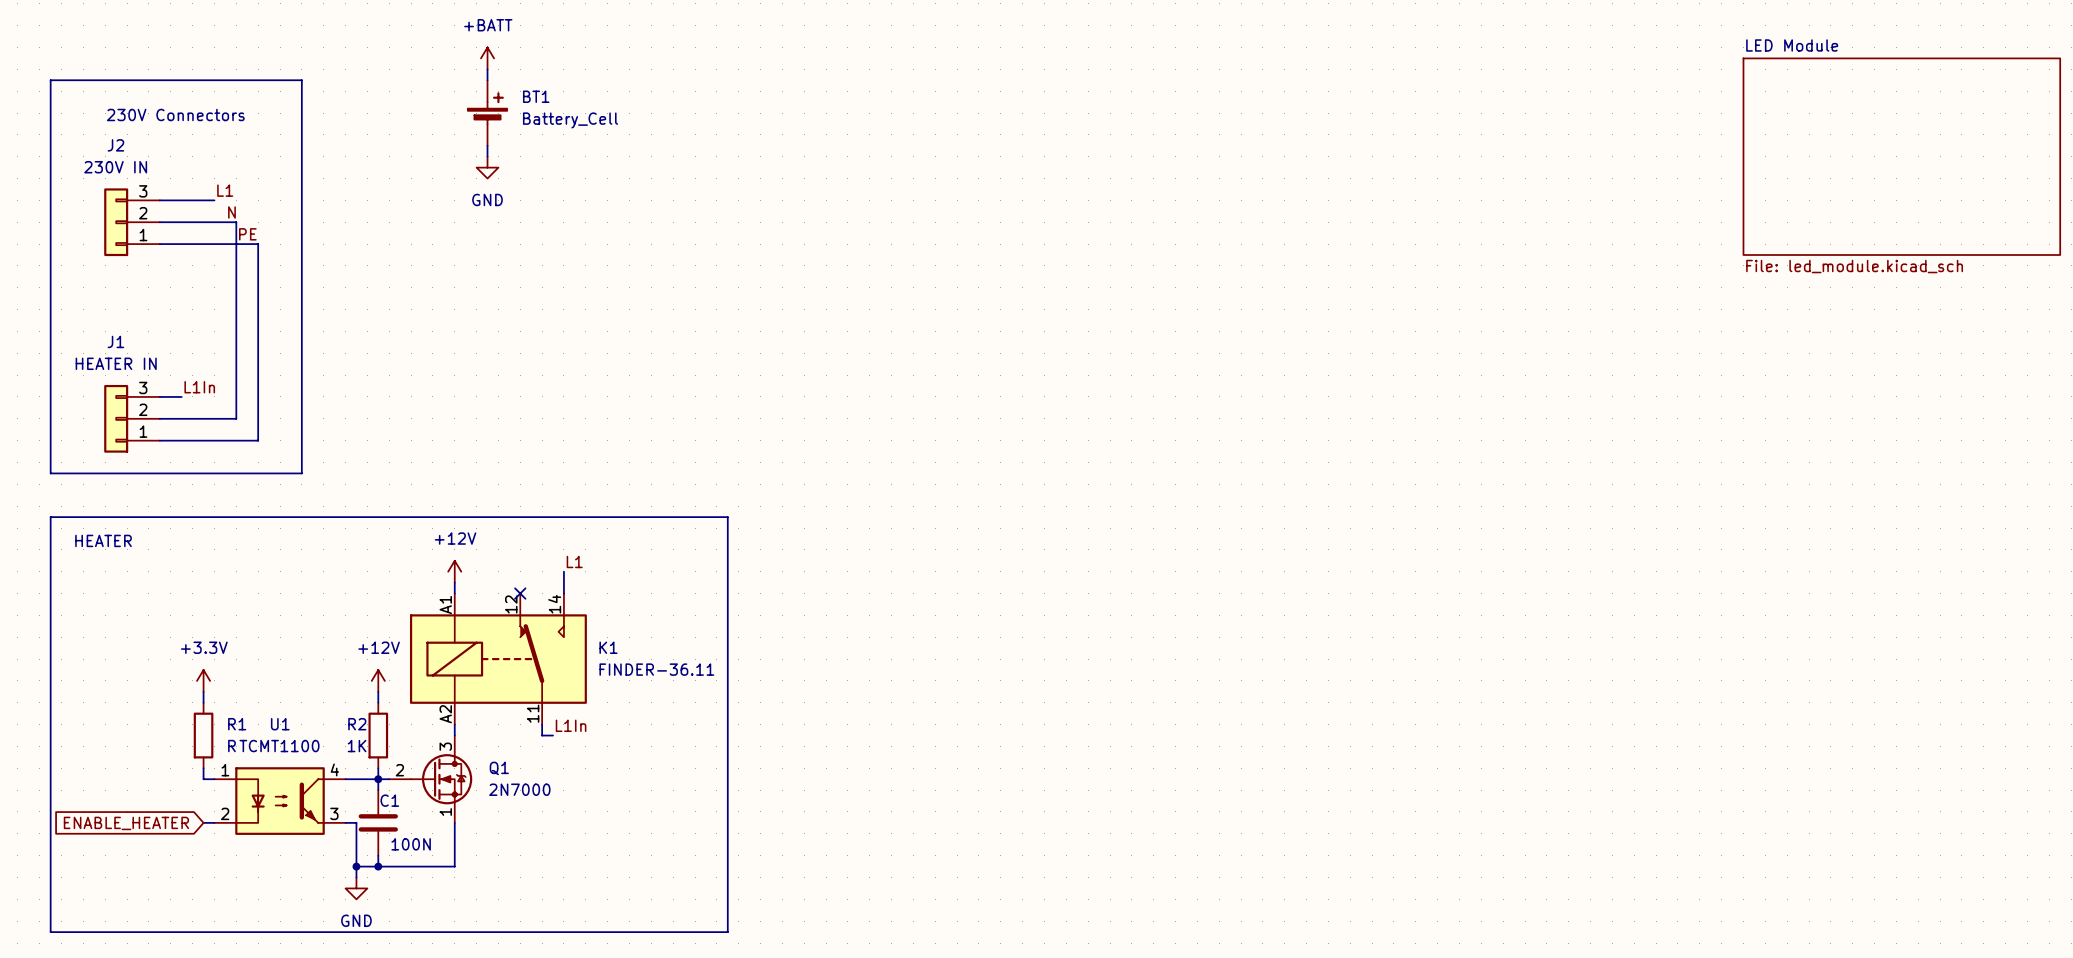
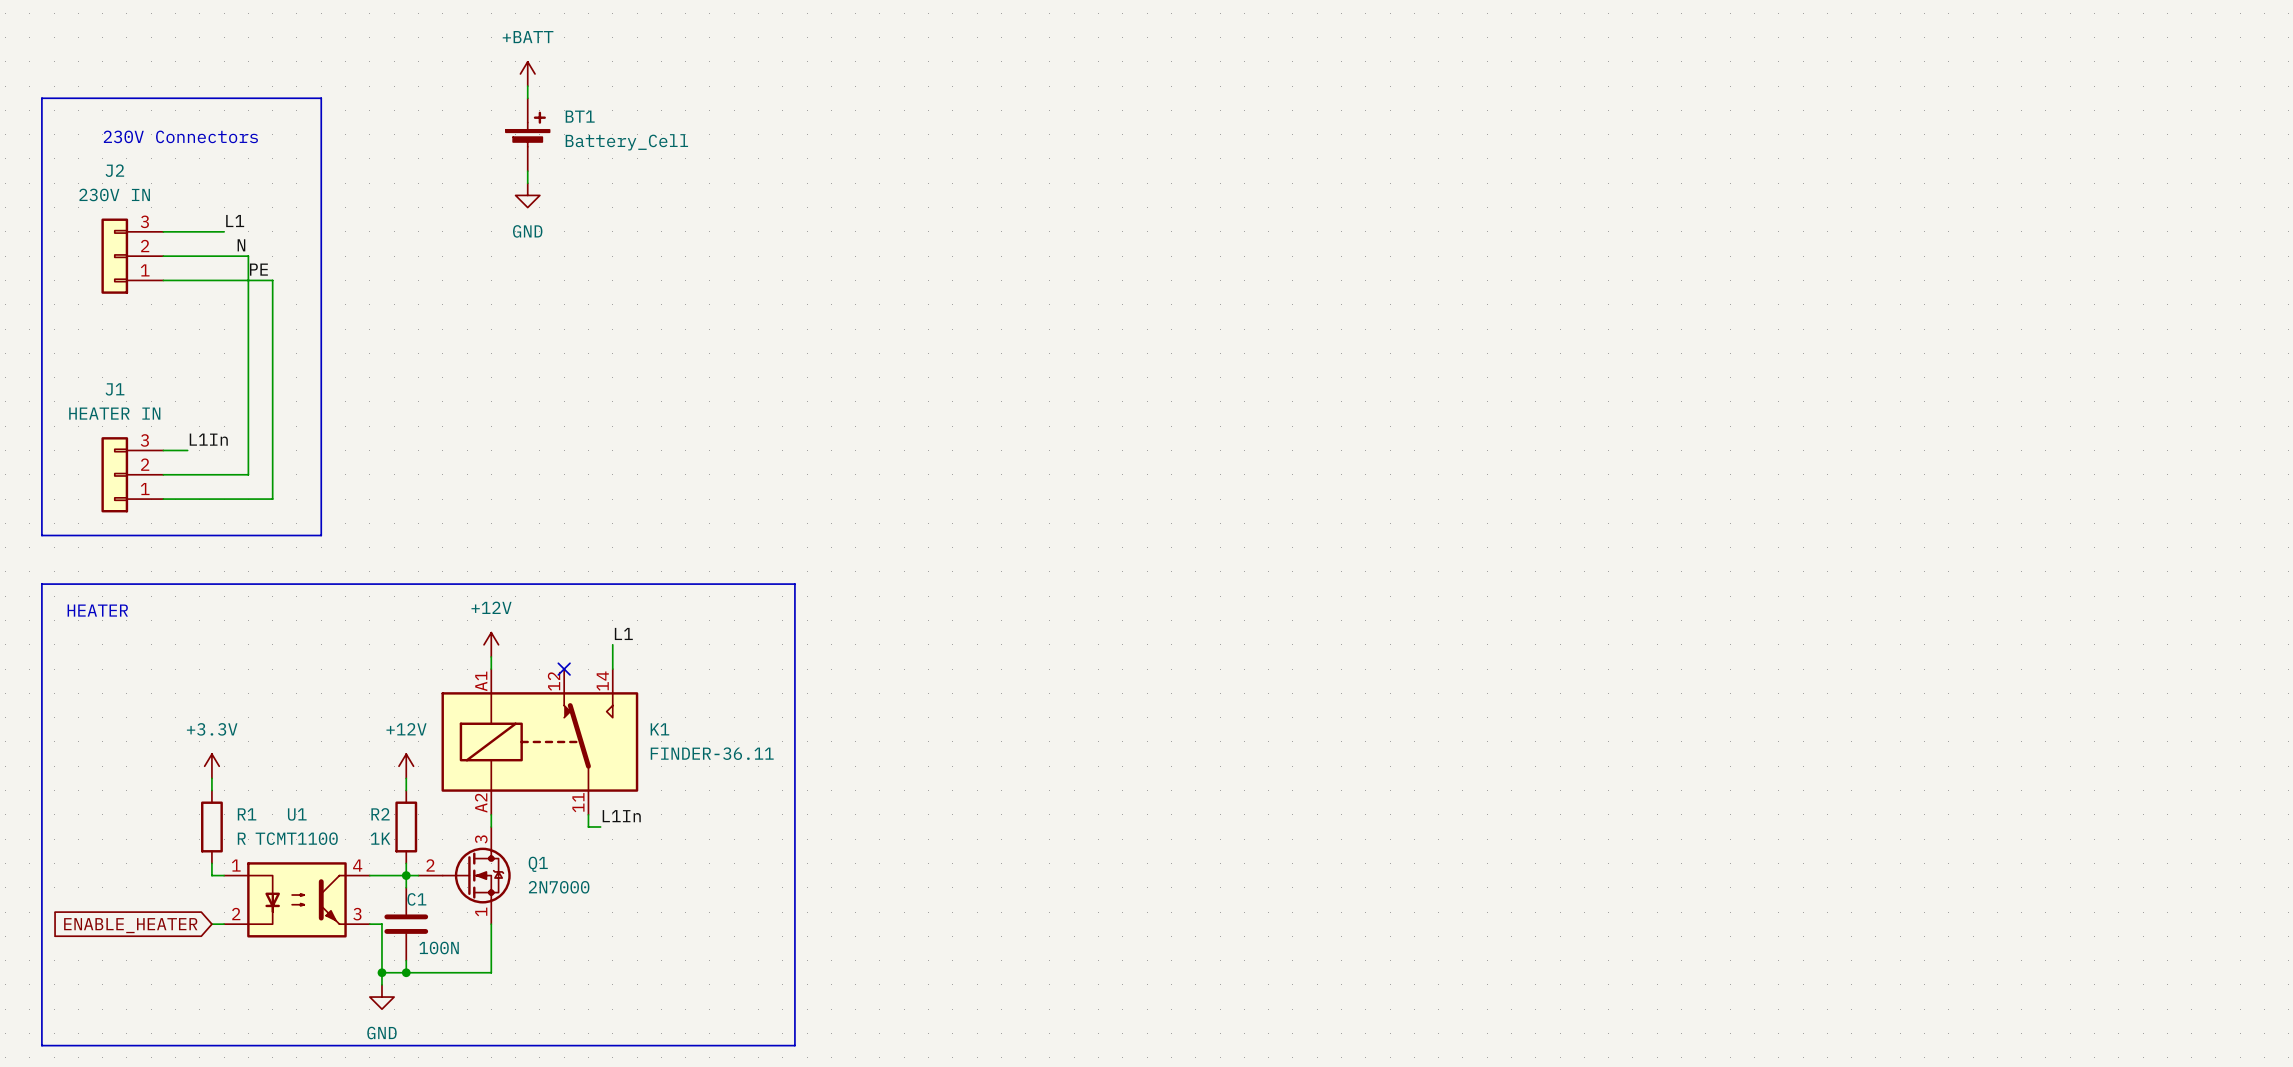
sheet LED Module: File: led_module.kicad_sch (1901, 156) -> none

